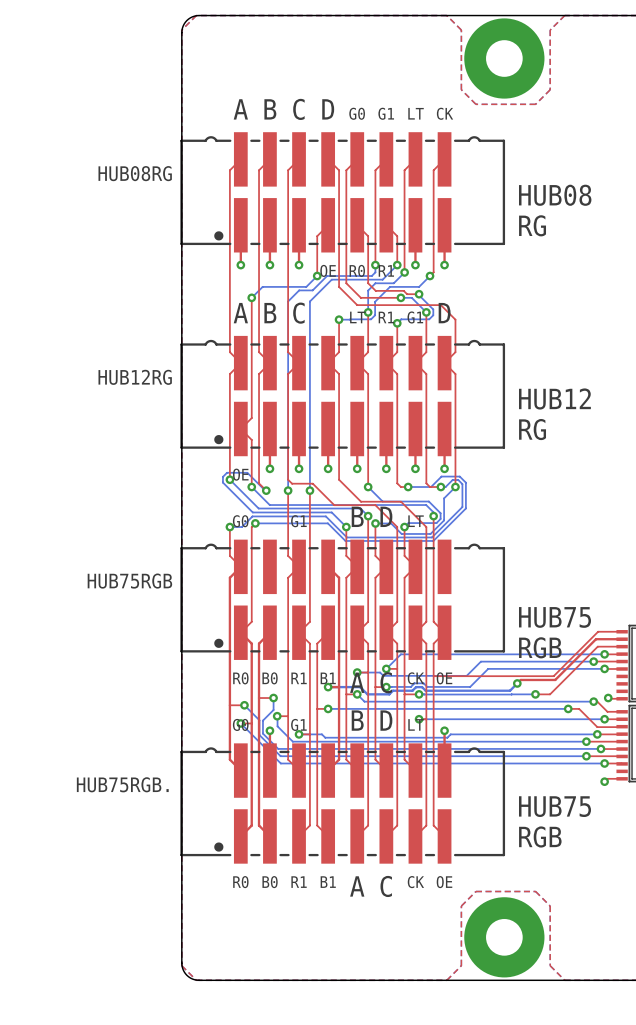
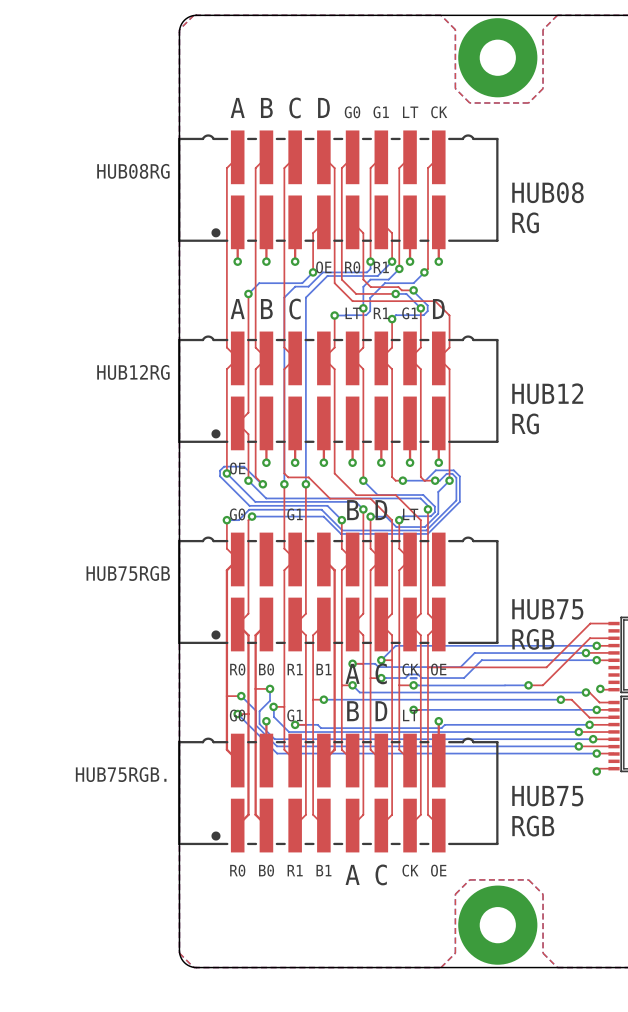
top track: (622, 639) (596, 639) (555, 679) (520, 679) (517, 683) -> none
bottom track: (517, 683) (510, 690) (425, 690) (422, 687) -> none
via: (517, 683) -> none
top track: (328, 687) (339, 687) -> none
bottom track: (328, 687) (360, 687) (367, 694) (389, 694) (392, 690) (412, 690) (416, 687) -> none
via: (328, 687) -> none

